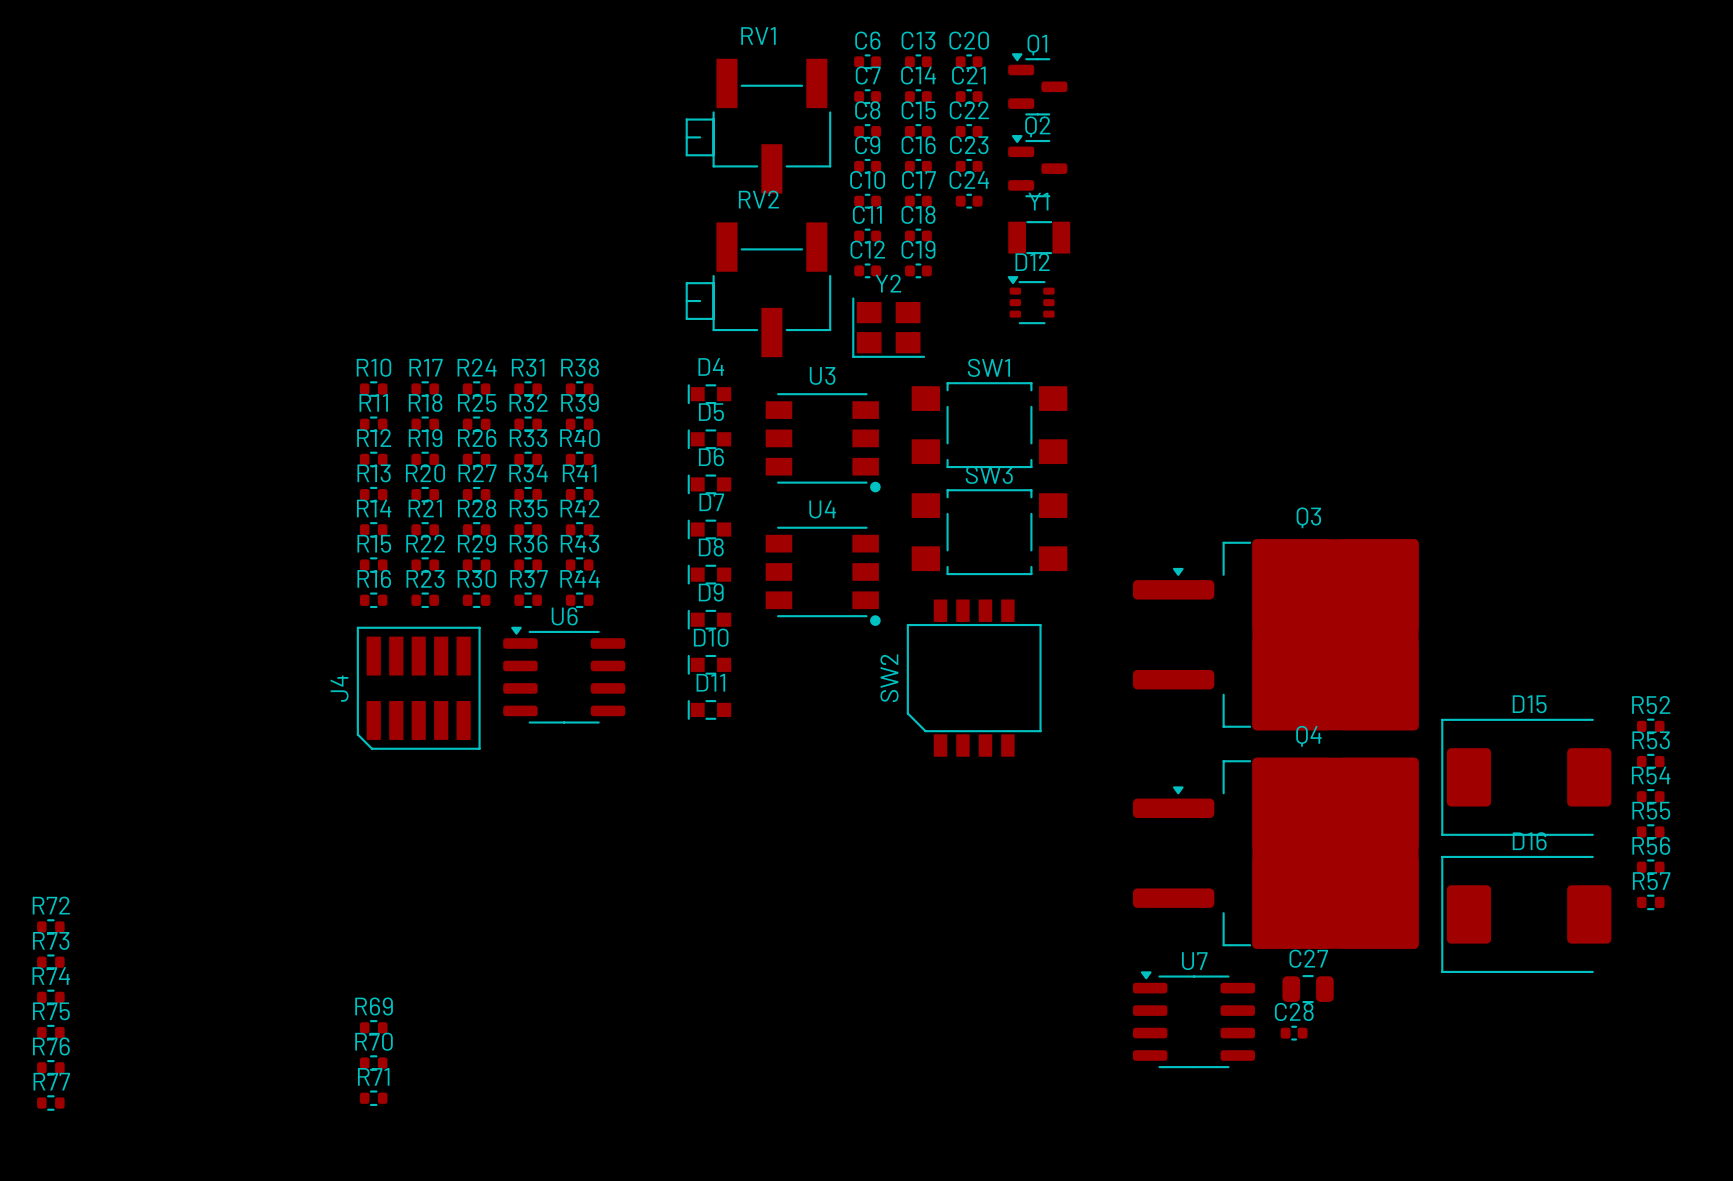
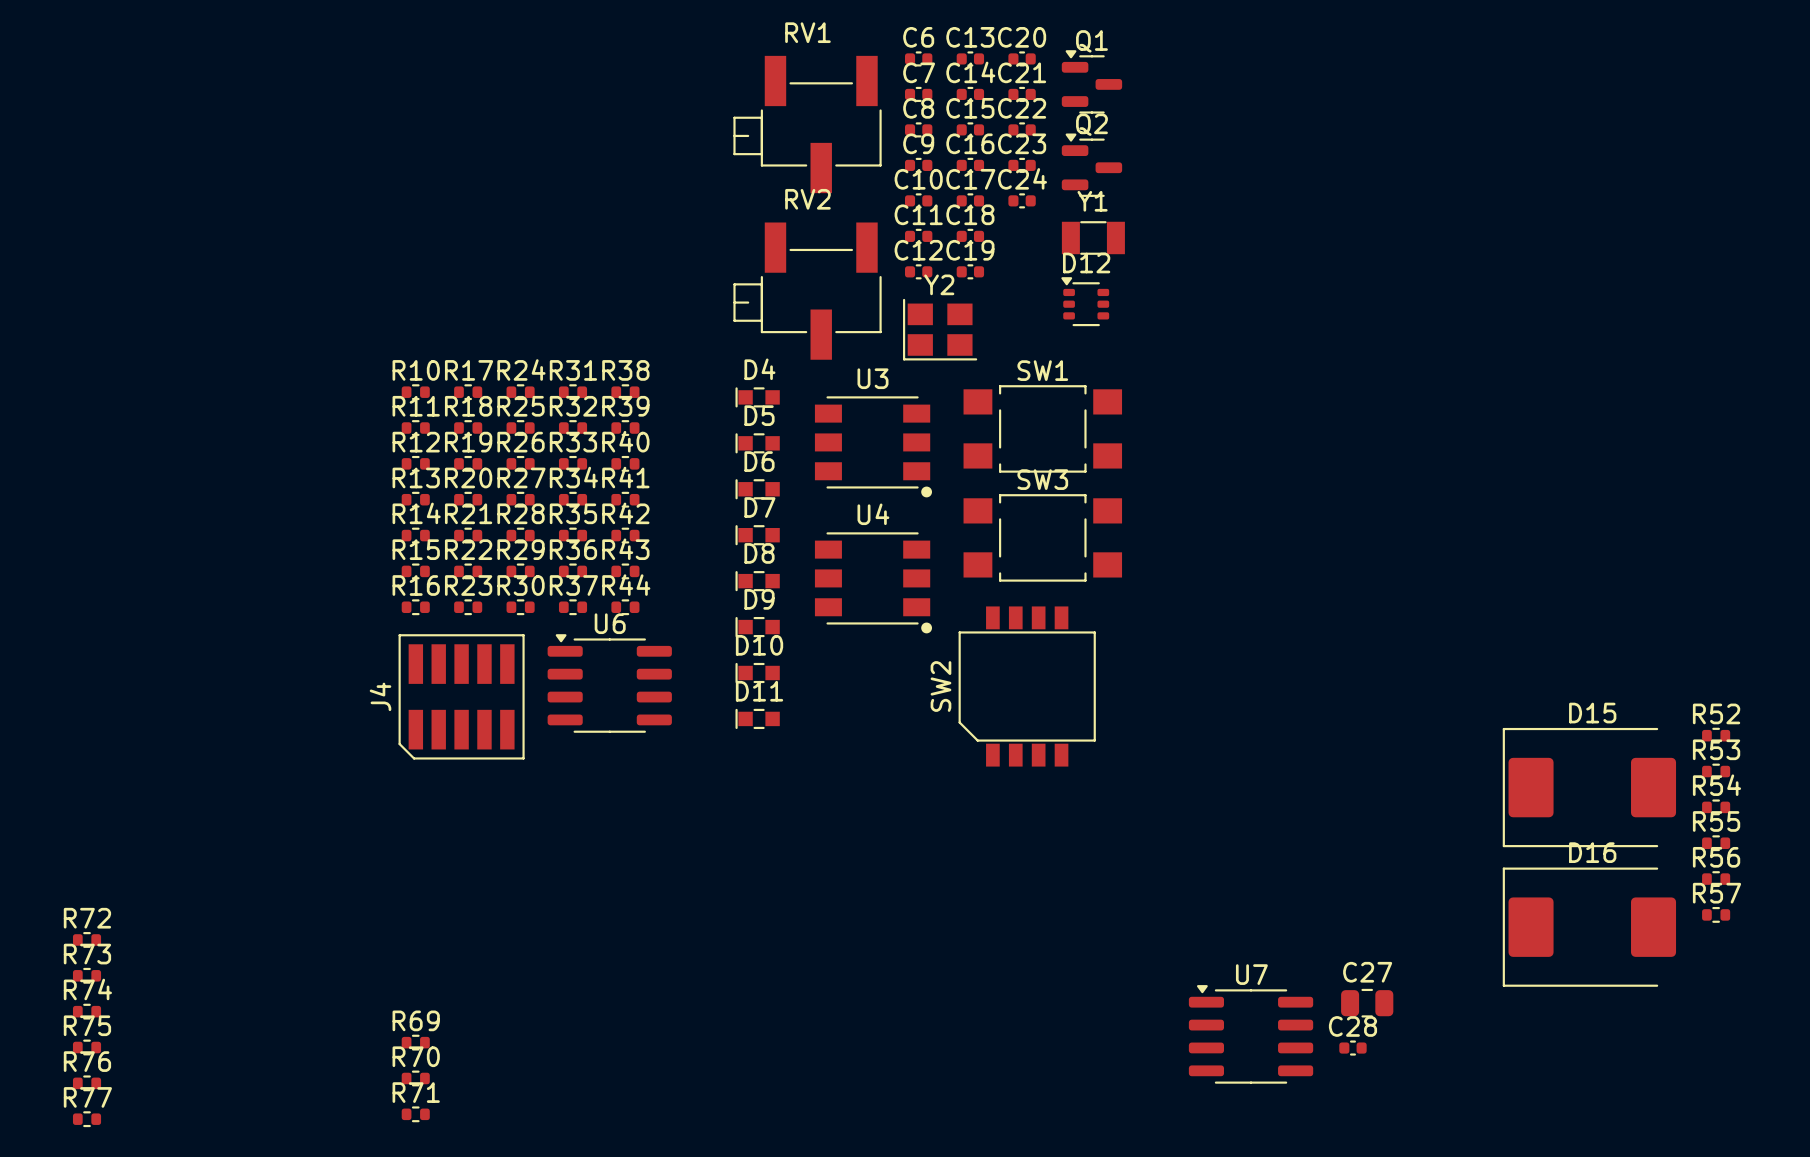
Q3: (1275, 634) -> none
Q4: (1275, 853) -> none

